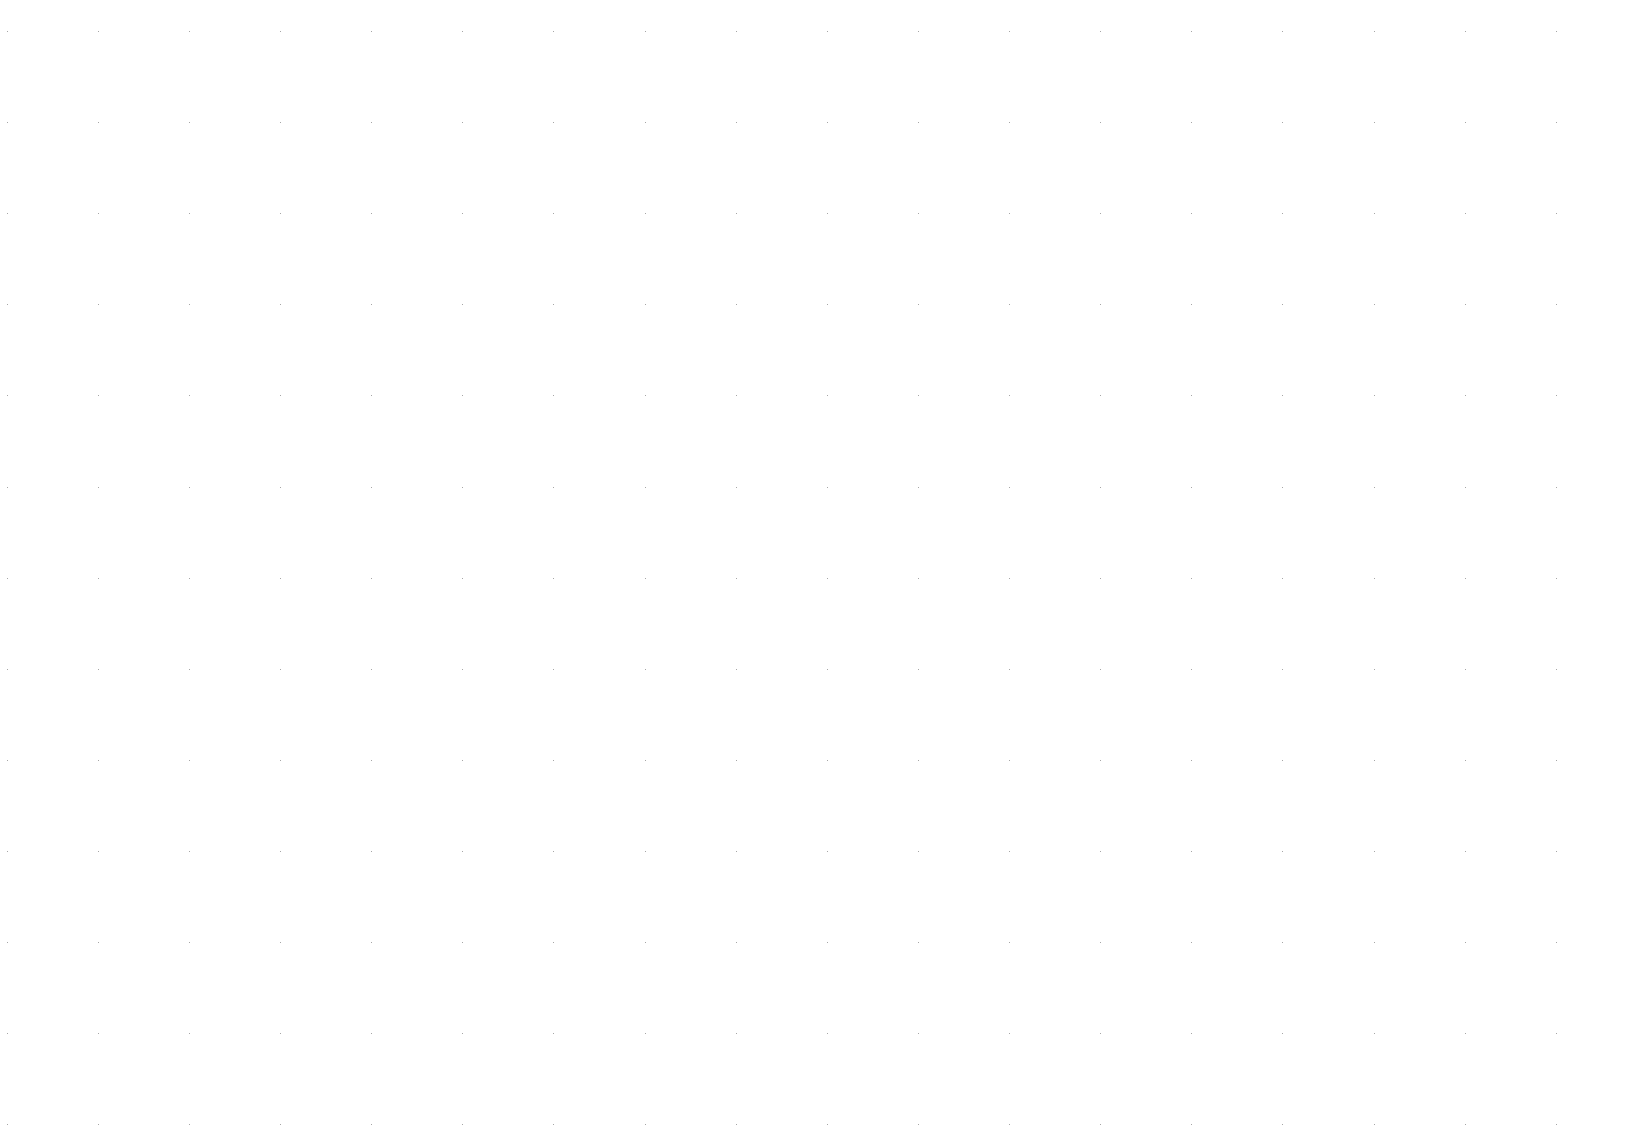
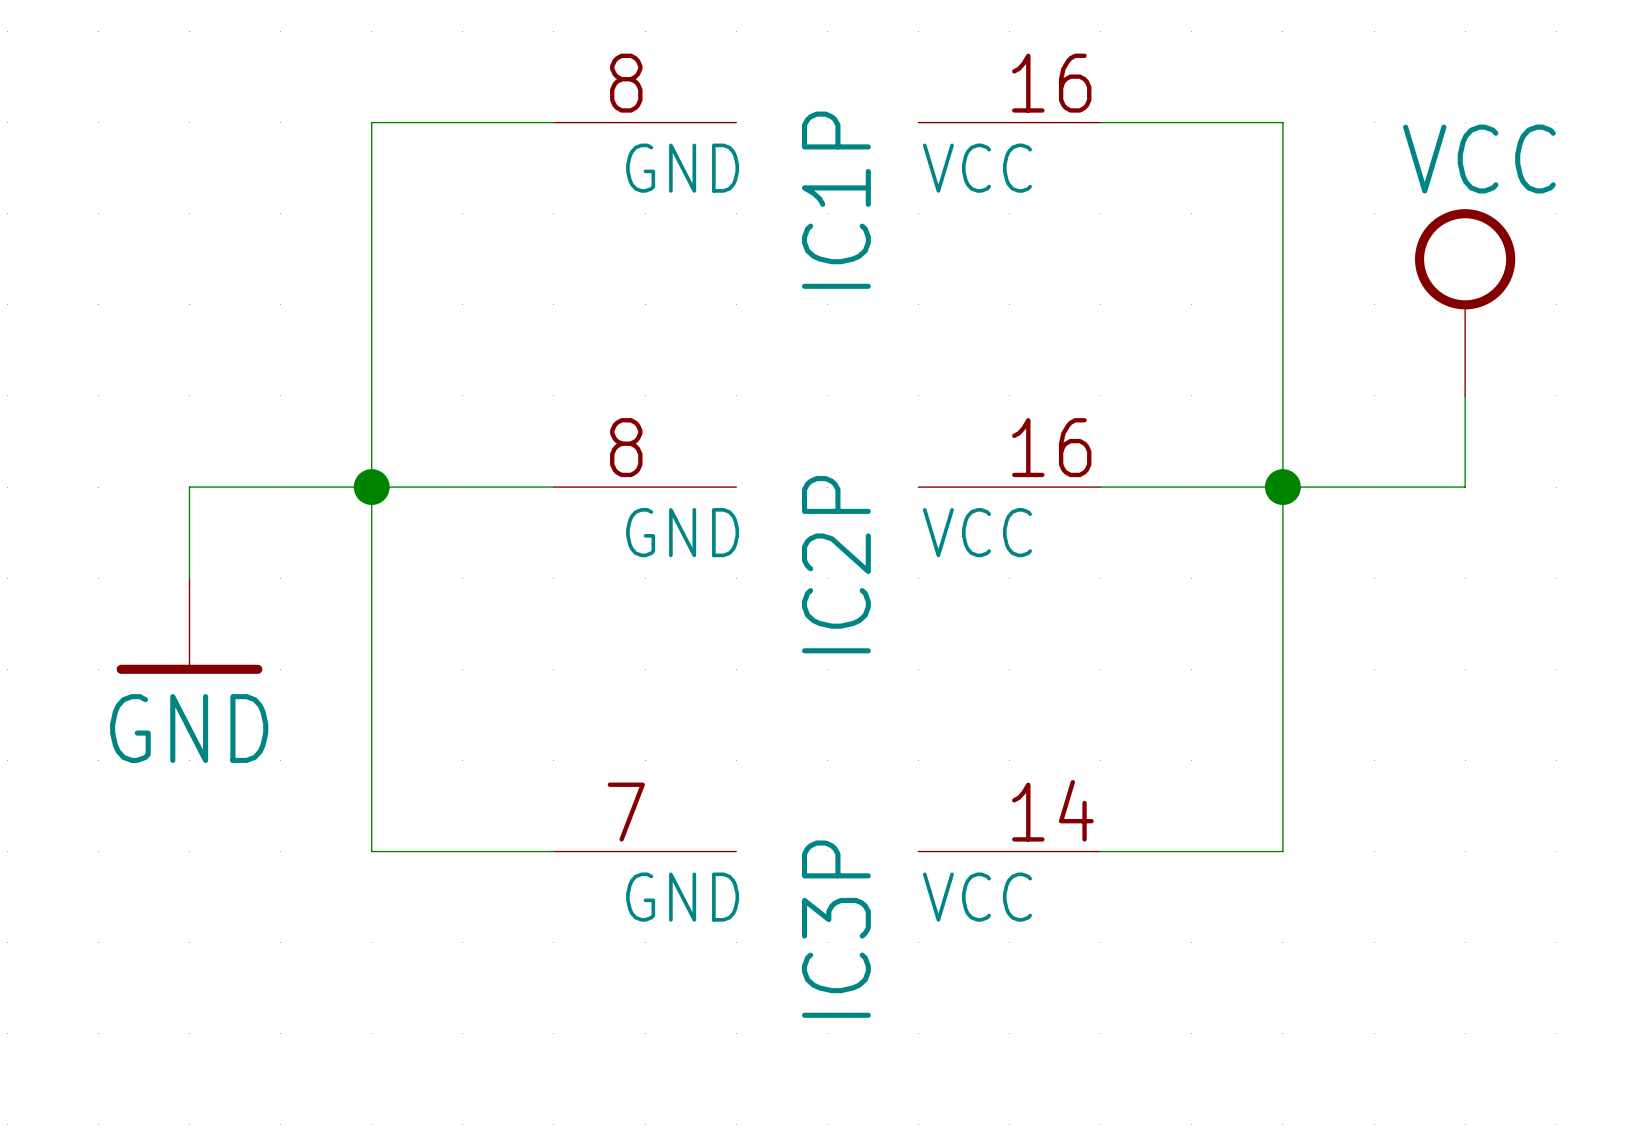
wire: none -> (553, 122) (371, 122) (371, 851) (553, 851)
IC1P: none -> (827, 122)
wire: none -> (1100, 122) (1282, 122) (1282, 851) (1100, 851)
power symbol: none -> VCC (1465, 302)
wire: none -> (1465, 395) (1465, 487) (1100, 487)
junction: none -> (371, 487)
wire: none -> (553, 487) (189, 487) (189, 578)
IC2P: none -> (827, 487)
junction: none -> (1282, 487)
power symbol: none -> GND (189, 626)
IC3P: none -> (827, 851)

